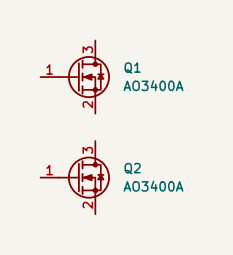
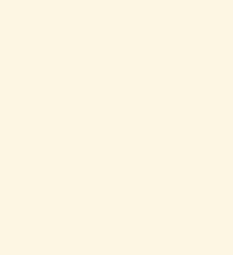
Q1: AO3400A (75, 77) -> none
Q2: AO3400A (75, 177) -> none

